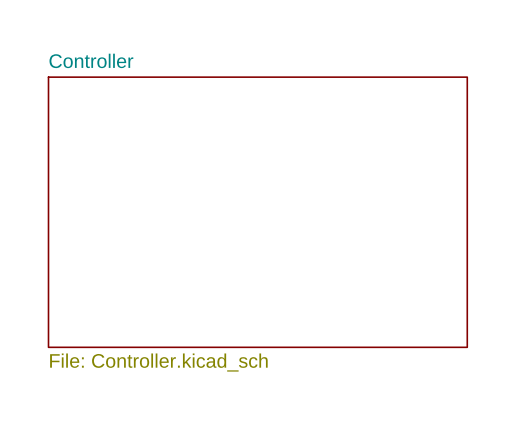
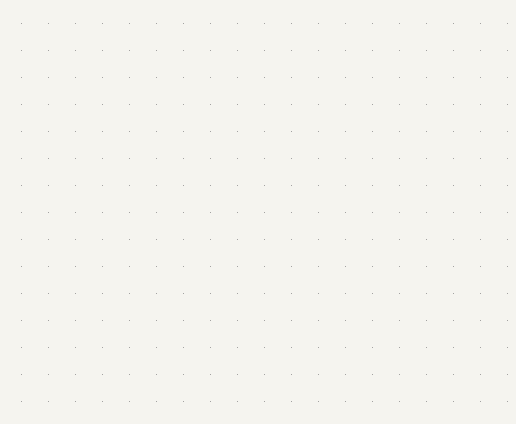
sheet Controller: File: Controller.kicad_sch (257, 212) -> none

